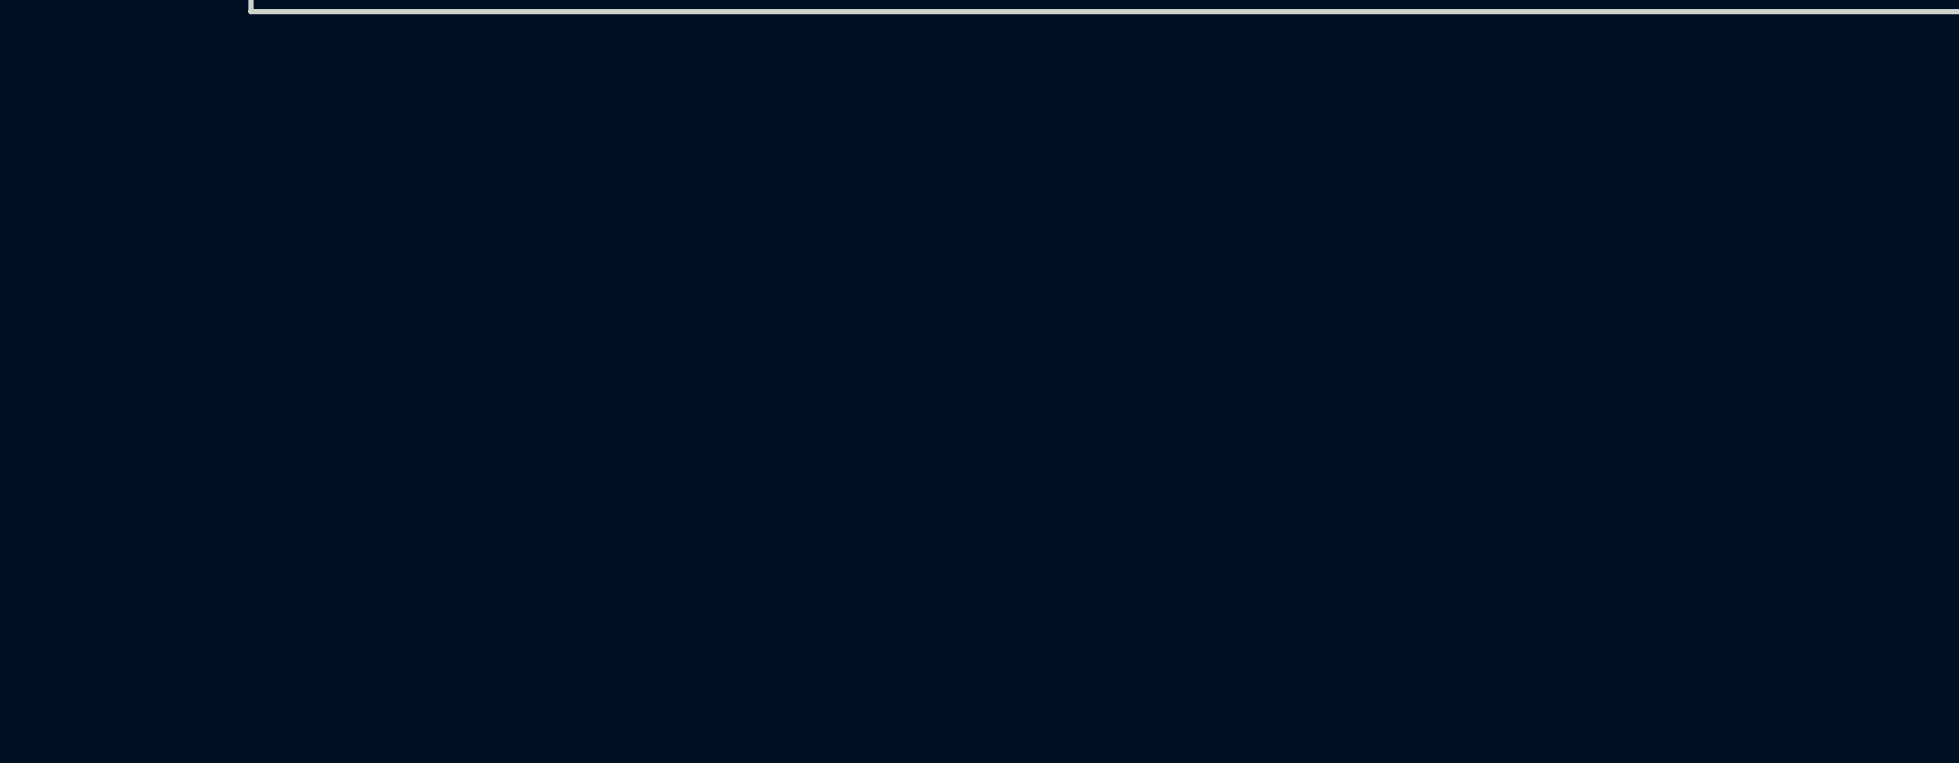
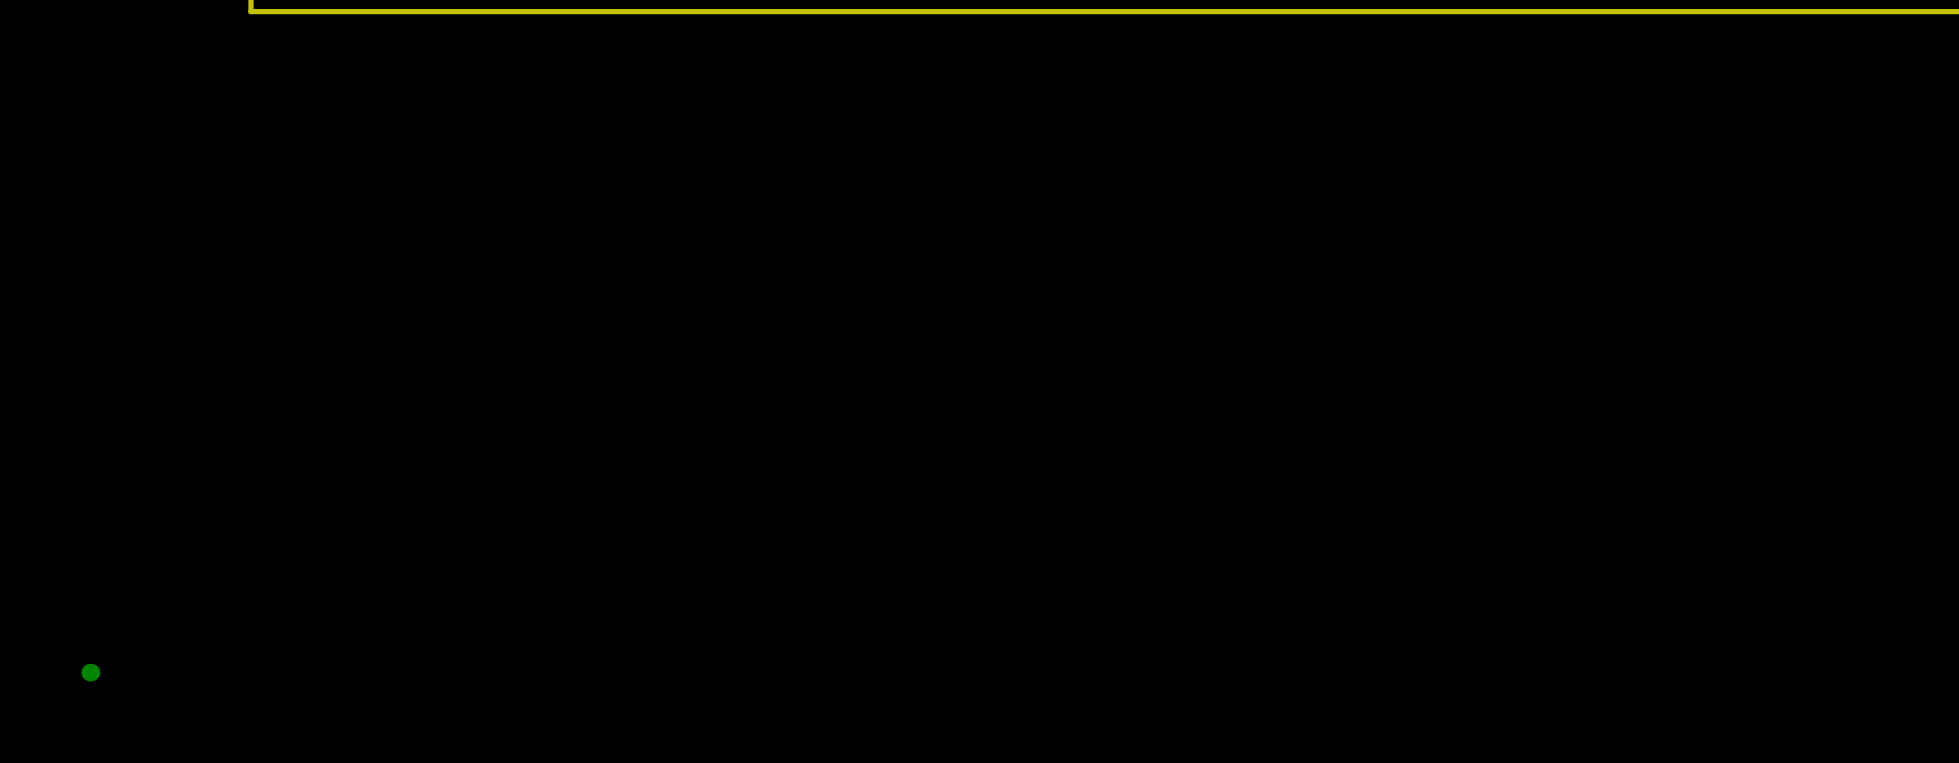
bottom track: none -> (91, 672) (90, 672)

